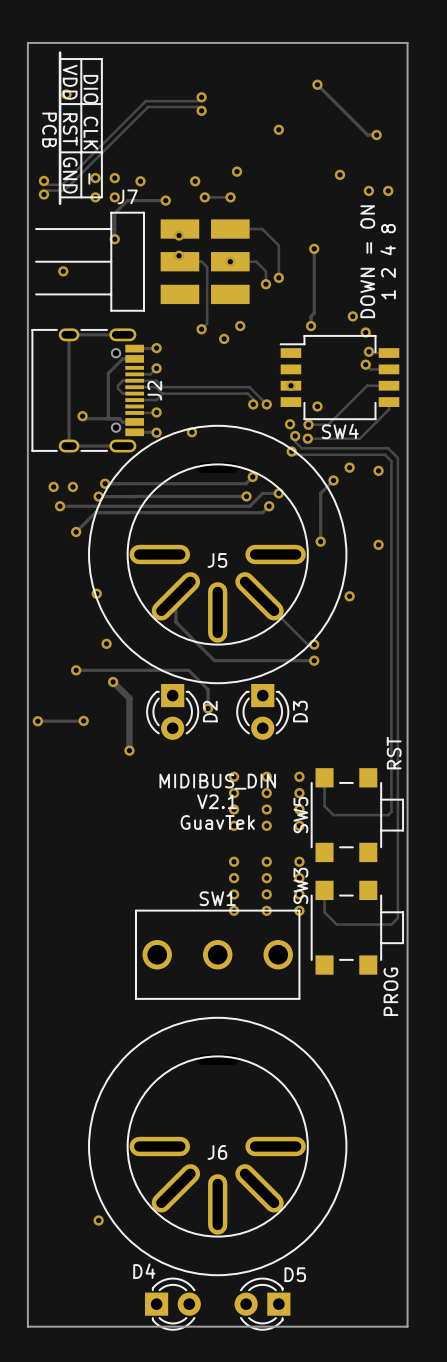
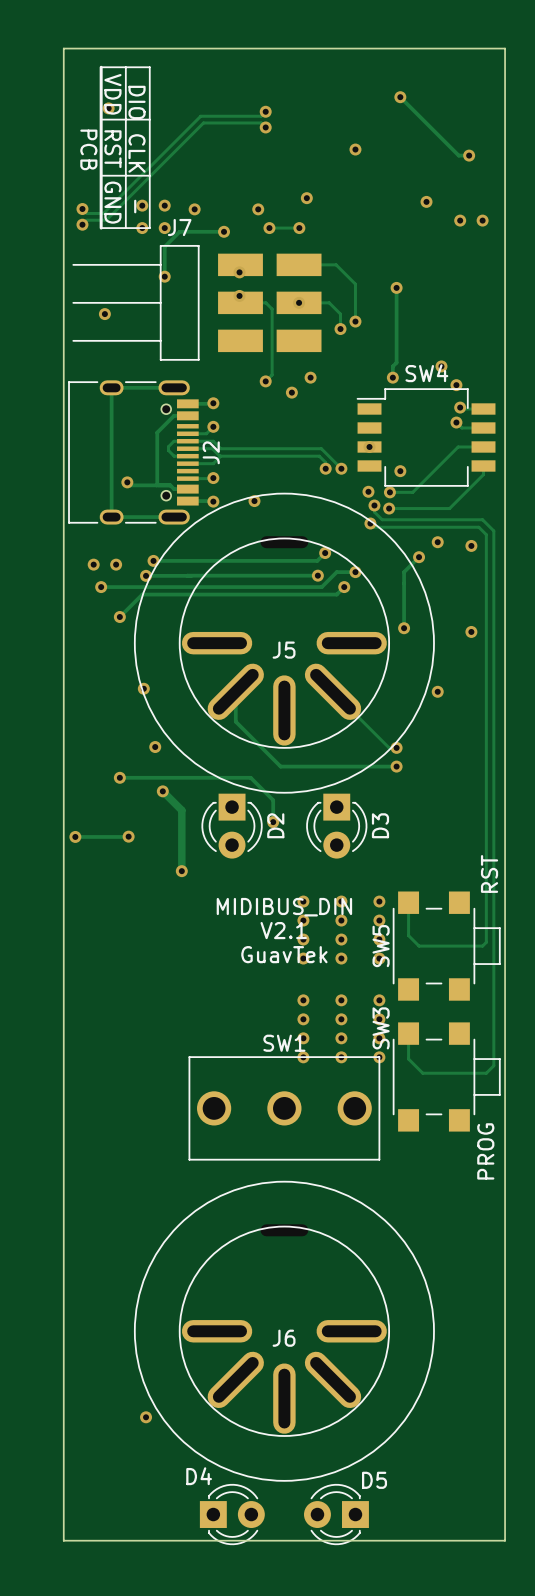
line: (60, 52) (60, 59) -> none
line: (60, 197) (60, 203) -> none
text: DOWN = ON (367, 261) -> none
text: 1 2 4 8 (388, 261) -> none
SW4 name position: SW4 (340, 431) -> SW4 (426, 373)

